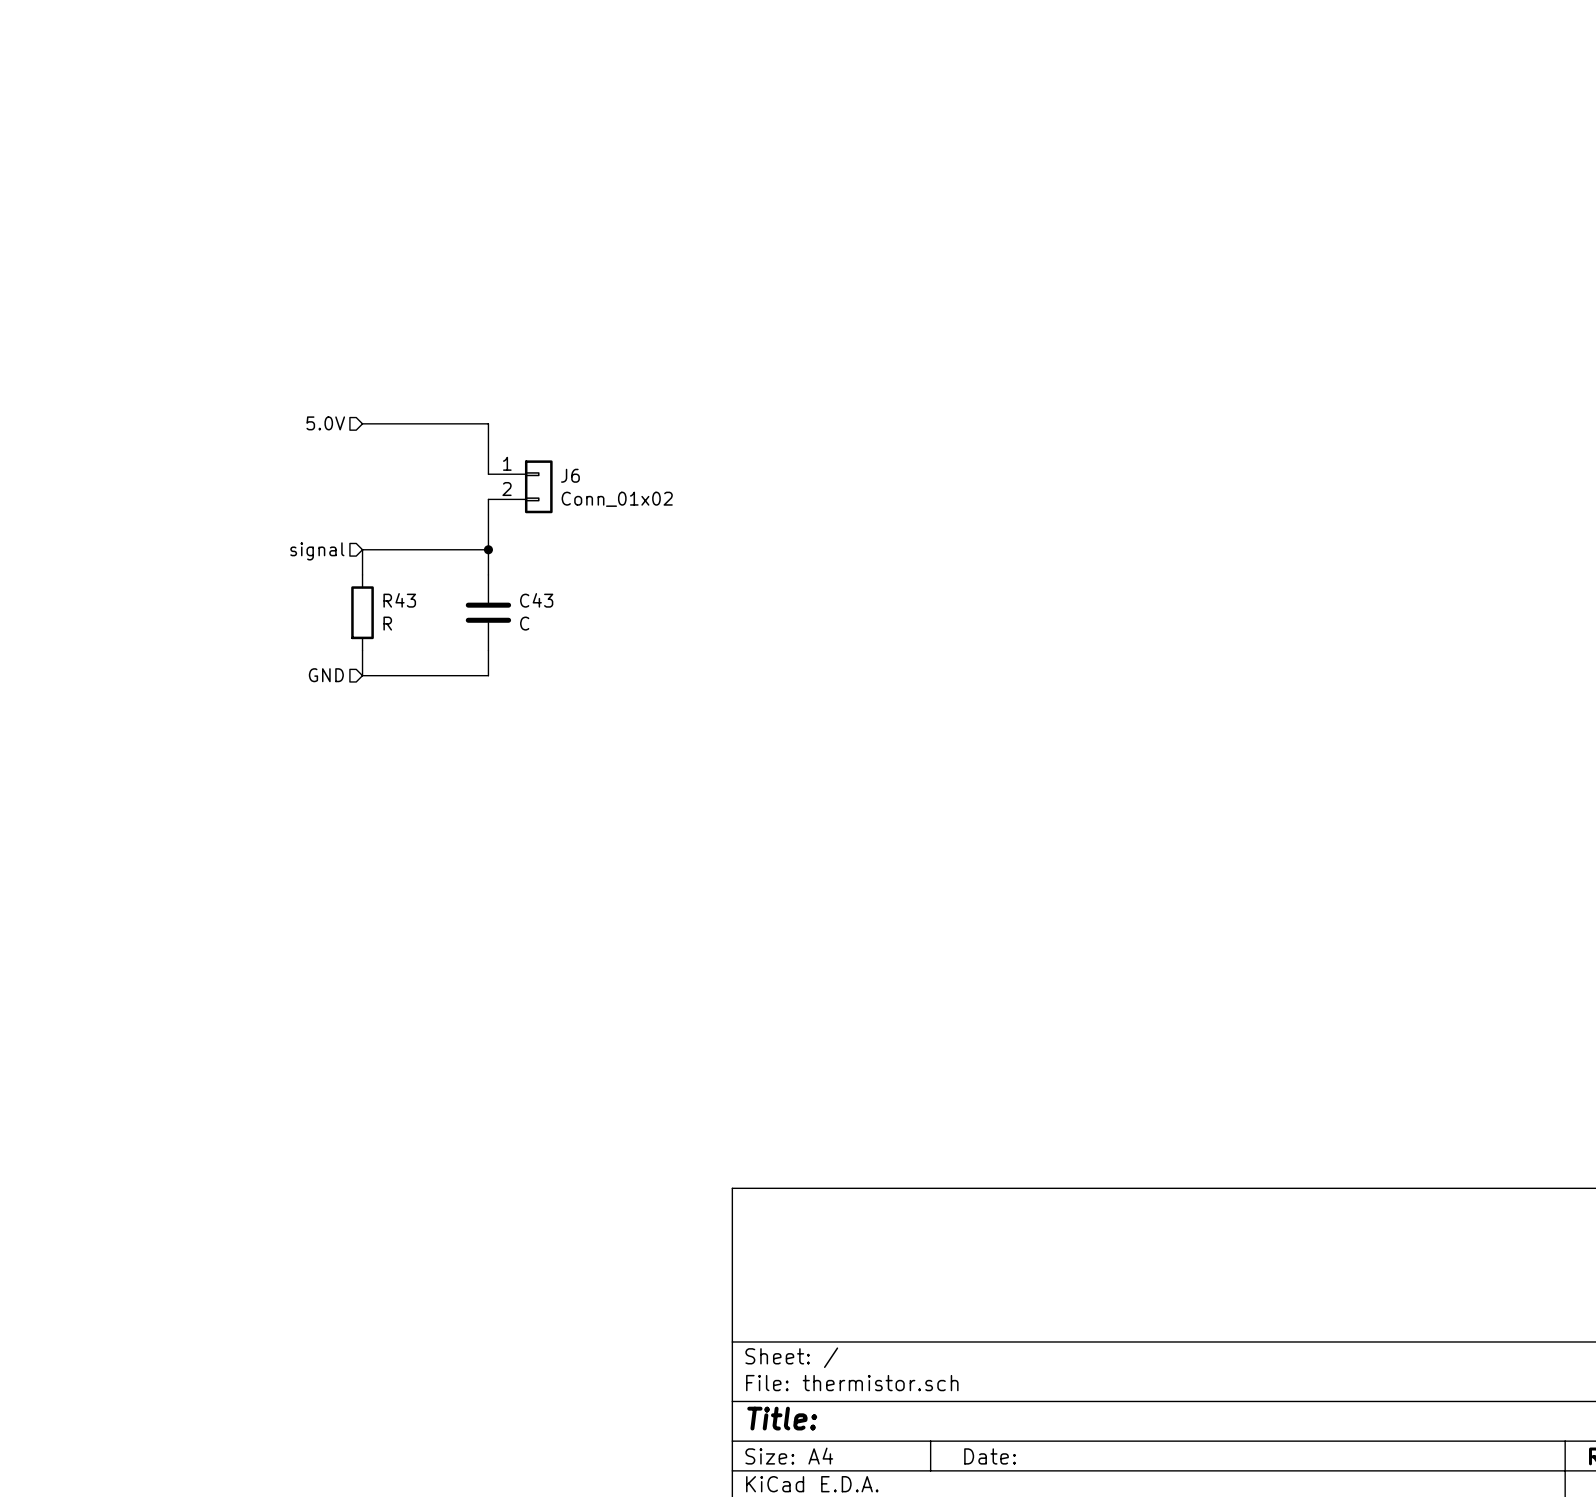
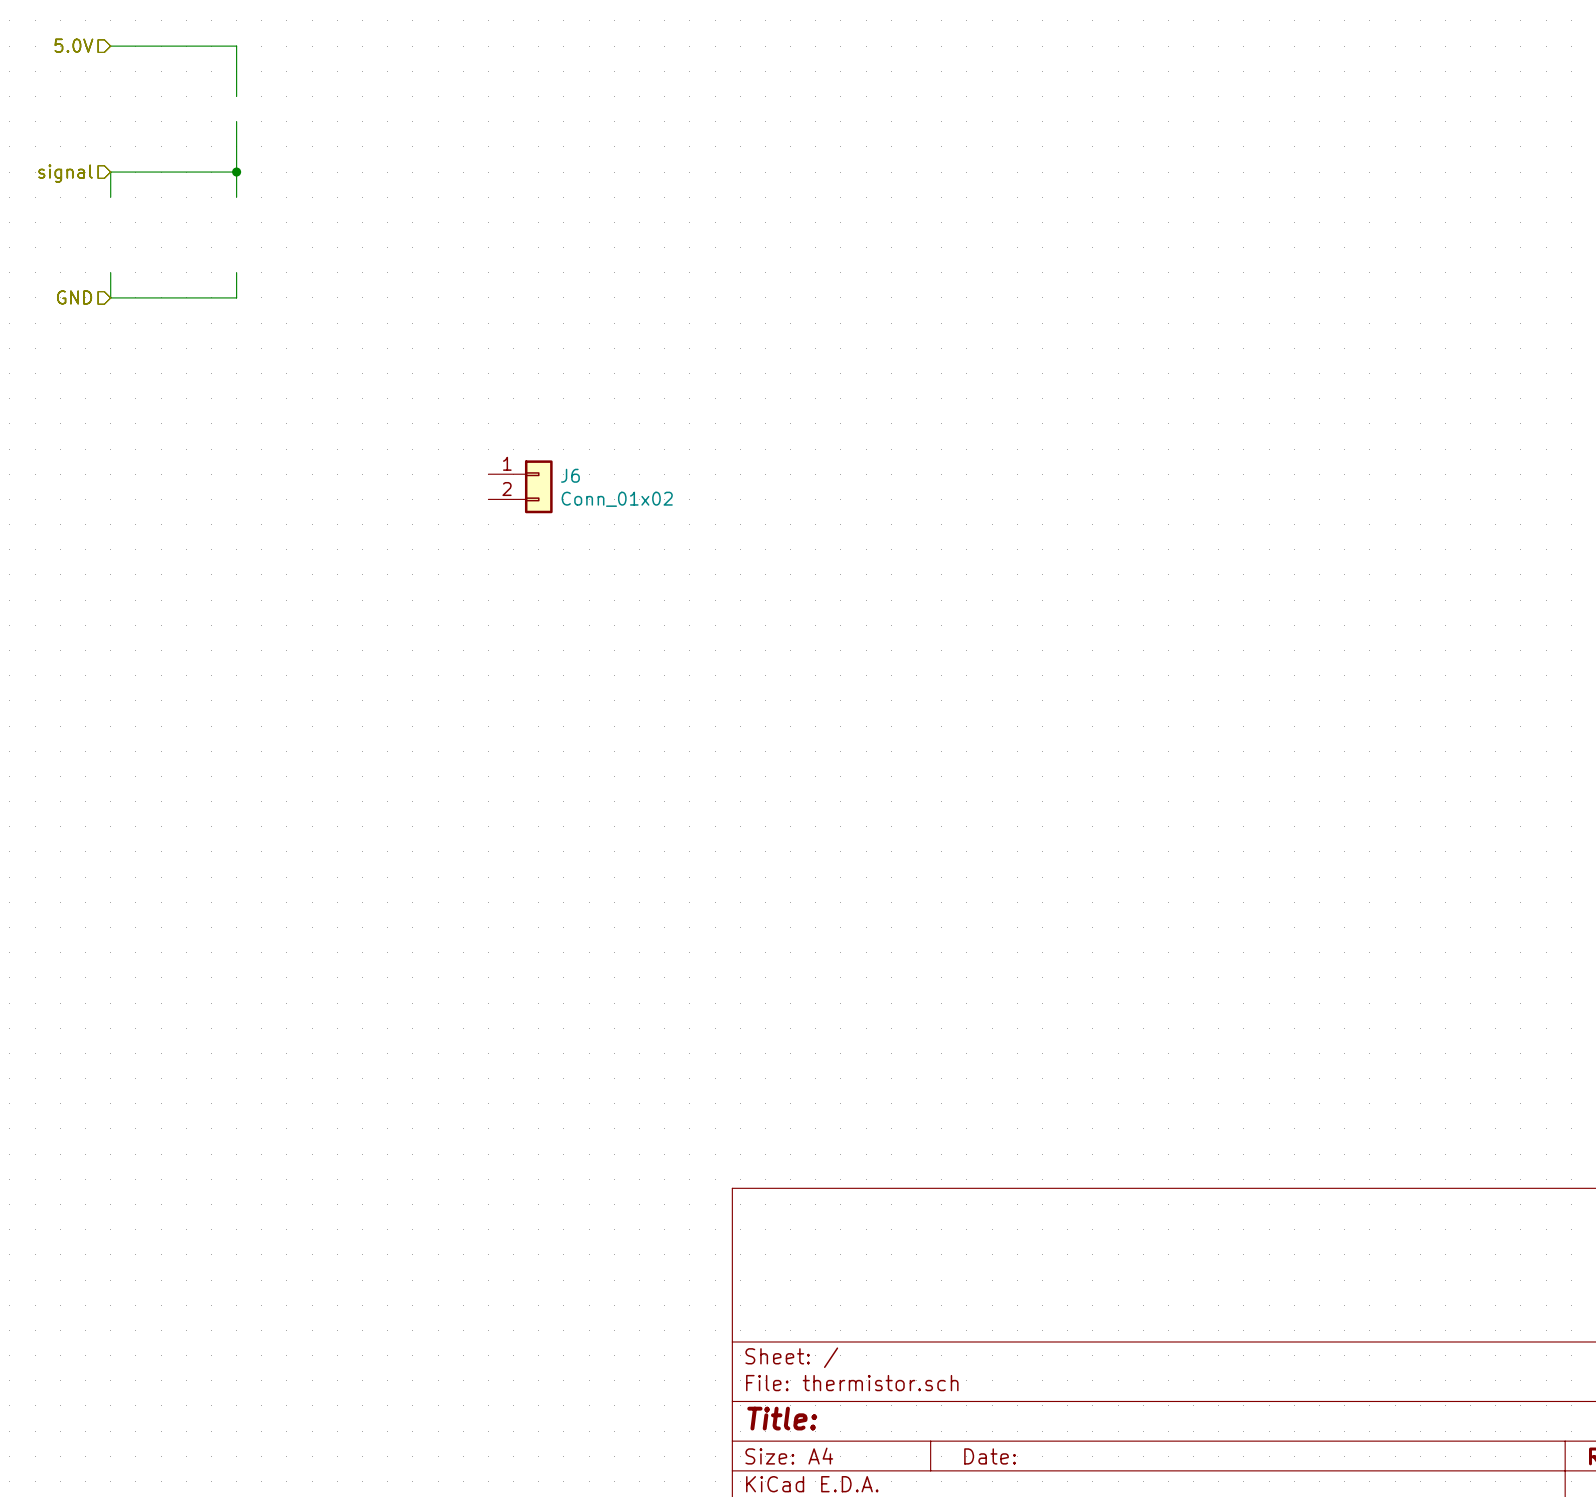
hierarchical label: none -> 5.0V (73, 45)
wire: none -> (110, 46) (236, 46) (236, 96)
wire: none -> (236, 121) (236, 197)
wire: none -> (236, 172) (110, 172) (110, 197)
junction: none -> (236, 172)
hierarchical label: none -> signal (65, 173)
wire: none -> (110, 272) (110, 297) (236, 297) (236, 272)
hierarchical label: none -> GND (74, 297)
hierarchical label: 5.0V (325, 423) -> none
wire: (362, 423) (488, 423) (488, 474) -> none
wire: (488, 499) (488, 574) -> none
wire: (488, 549) (362, 549) (362, 574) -> none
junction: (488, 549) -> none
hierarchical label: signal (317, 551) -> none
R43: R (362, 612) -> none
C43: C (488, 612) -> none
wire: (362, 650) (362, 675) (488, 675) (488, 650) -> none
hierarchical label: GND (326, 675) -> none

